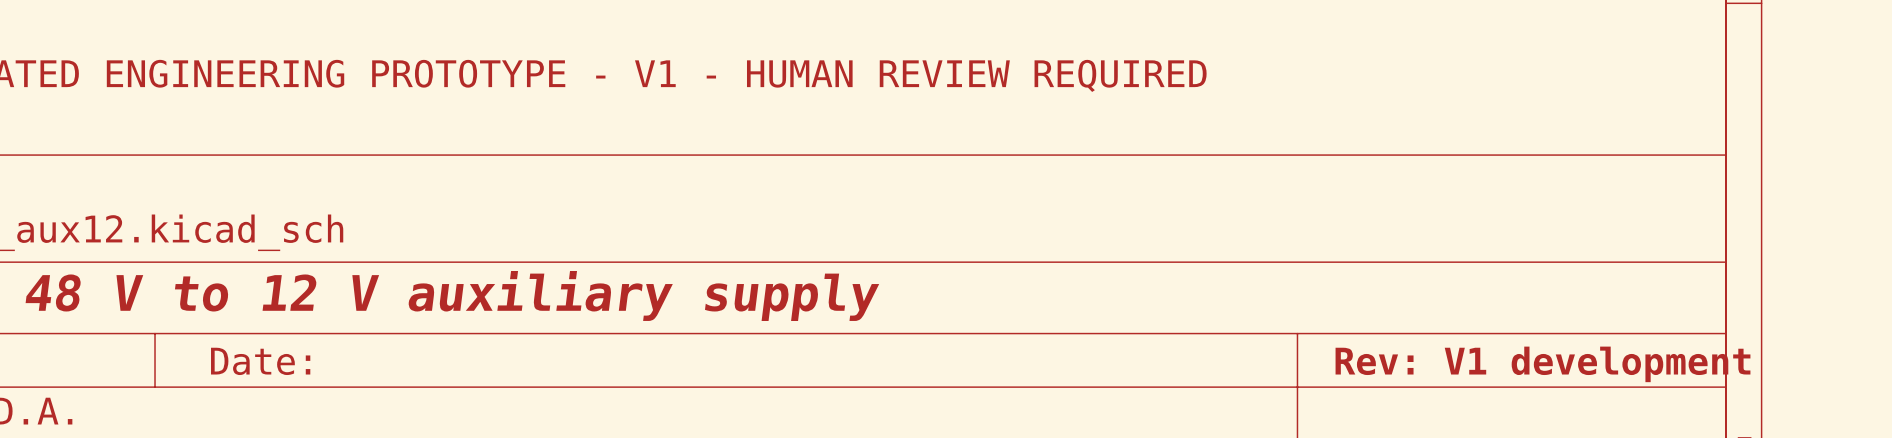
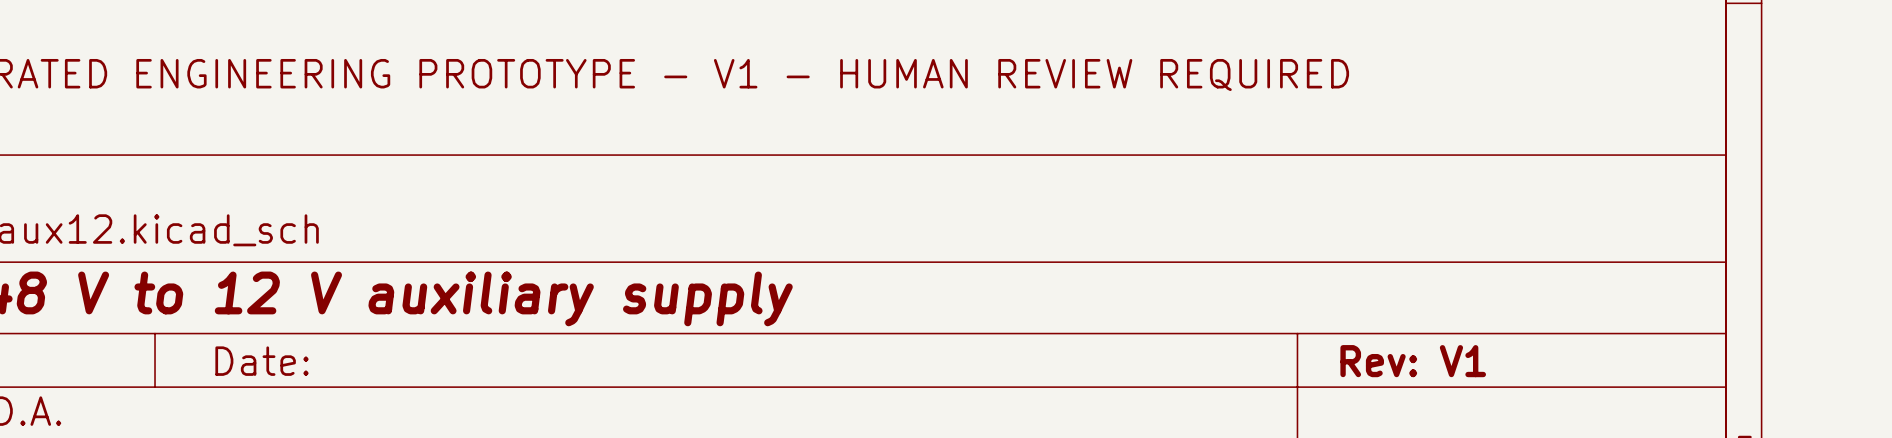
title block: Rev: V1 development (1542, 364) -> Rev: V1 (1413, 361)

